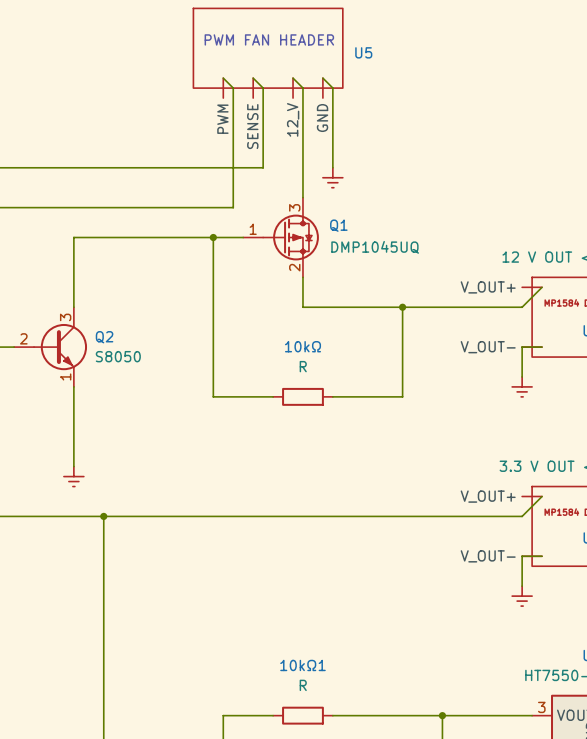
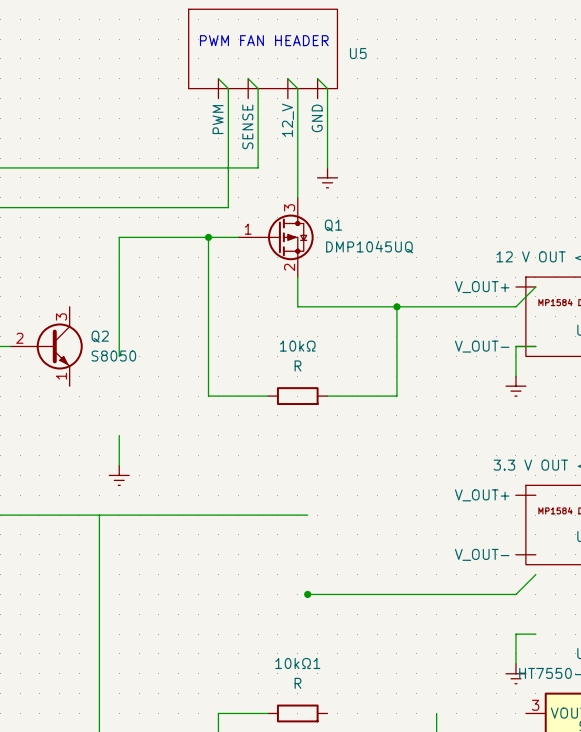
wire: (123, 237) (73, 237) (73, 307) -> (119, 237) (119, 356)
wire: (73, 386) (73, 466) -> none
wire: none -> (119, 435) (119, 465)
power symbol position: (73, 476) -> (119, 475)
wire: (542, 496) (522, 516) (312, 516) -> (535, 574) (515, 594) (307, 594)
junction: (103, 516) -> none
wire: (542, 556) (522, 556) (522, 586) -> (535, 634) (515, 634) (515, 663)
junction: none -> (307, 594)
power symbol position: (522, 596) -> (515, 673)
wire: (332, 715) (532, 715) -> none
junction: (442, 715) -> none

